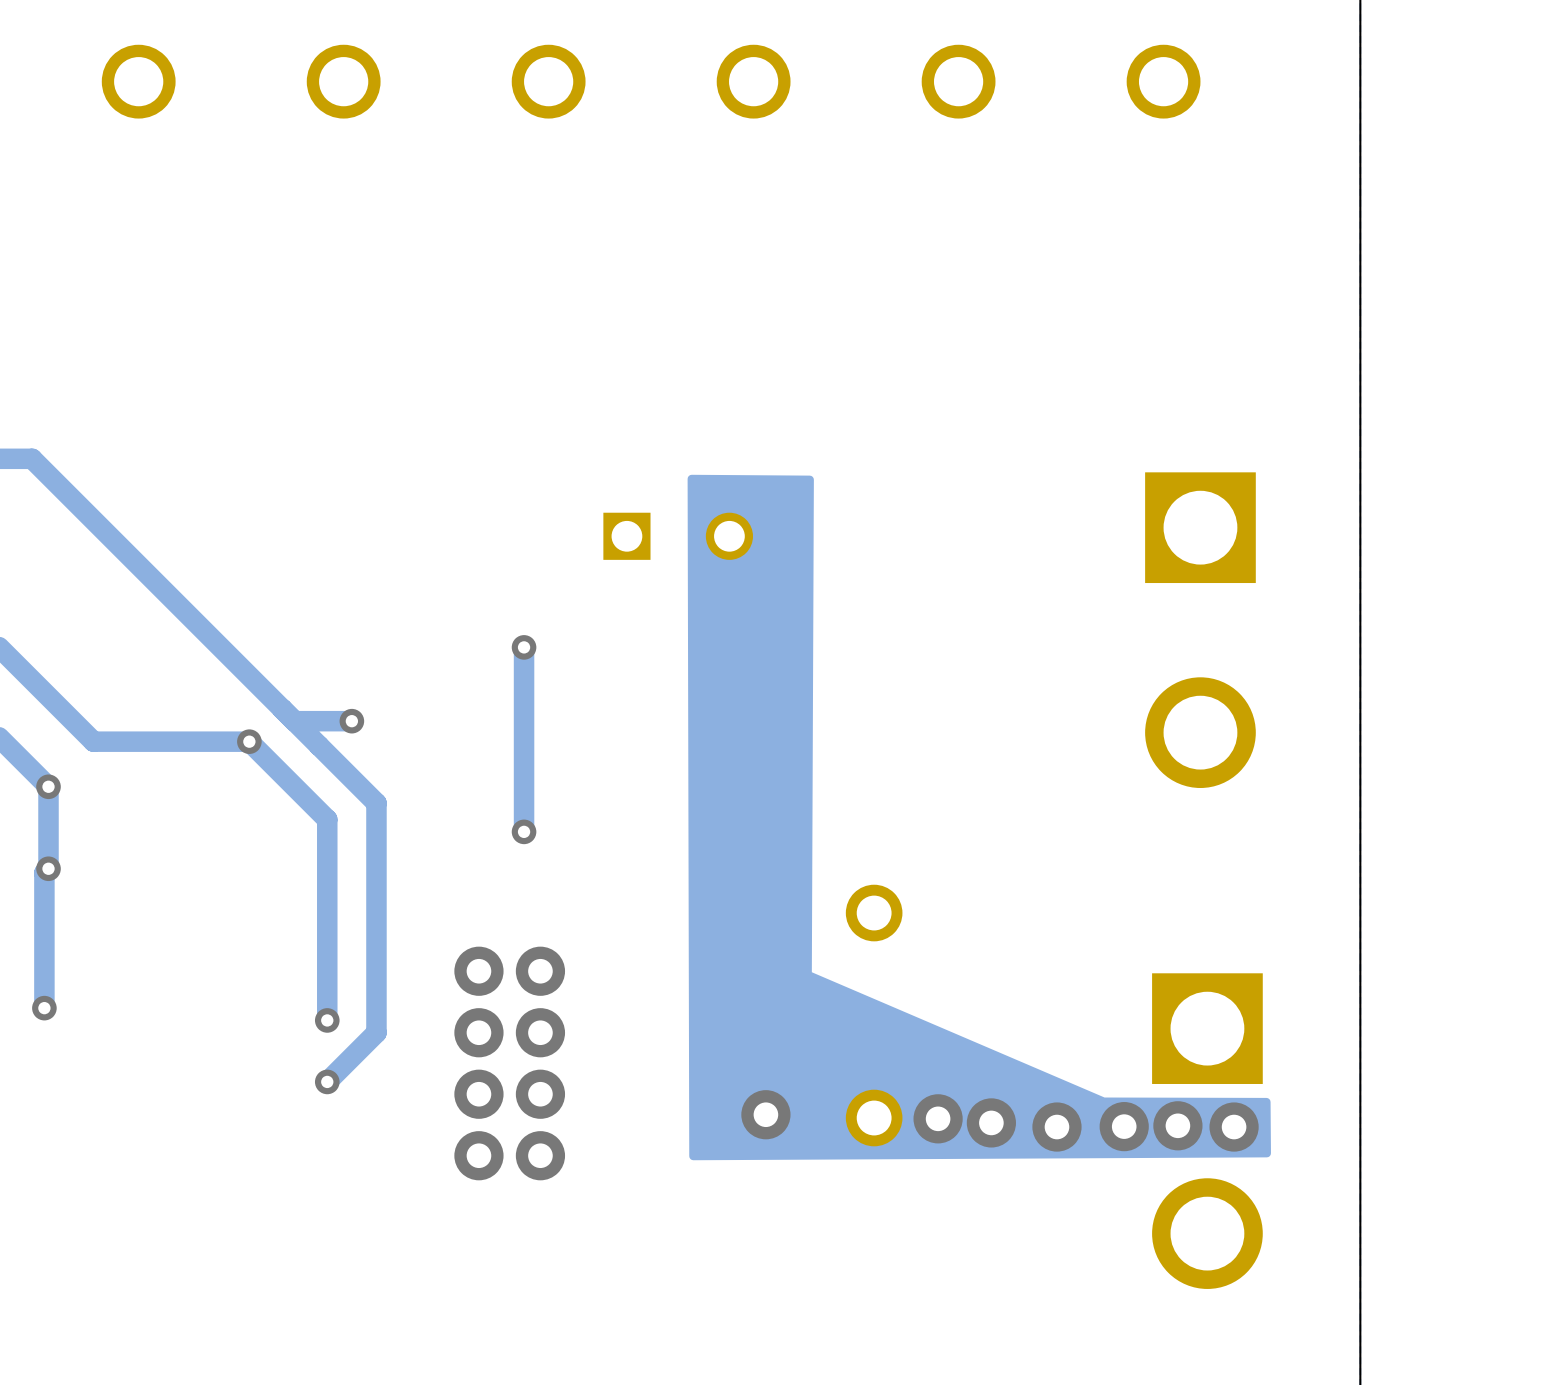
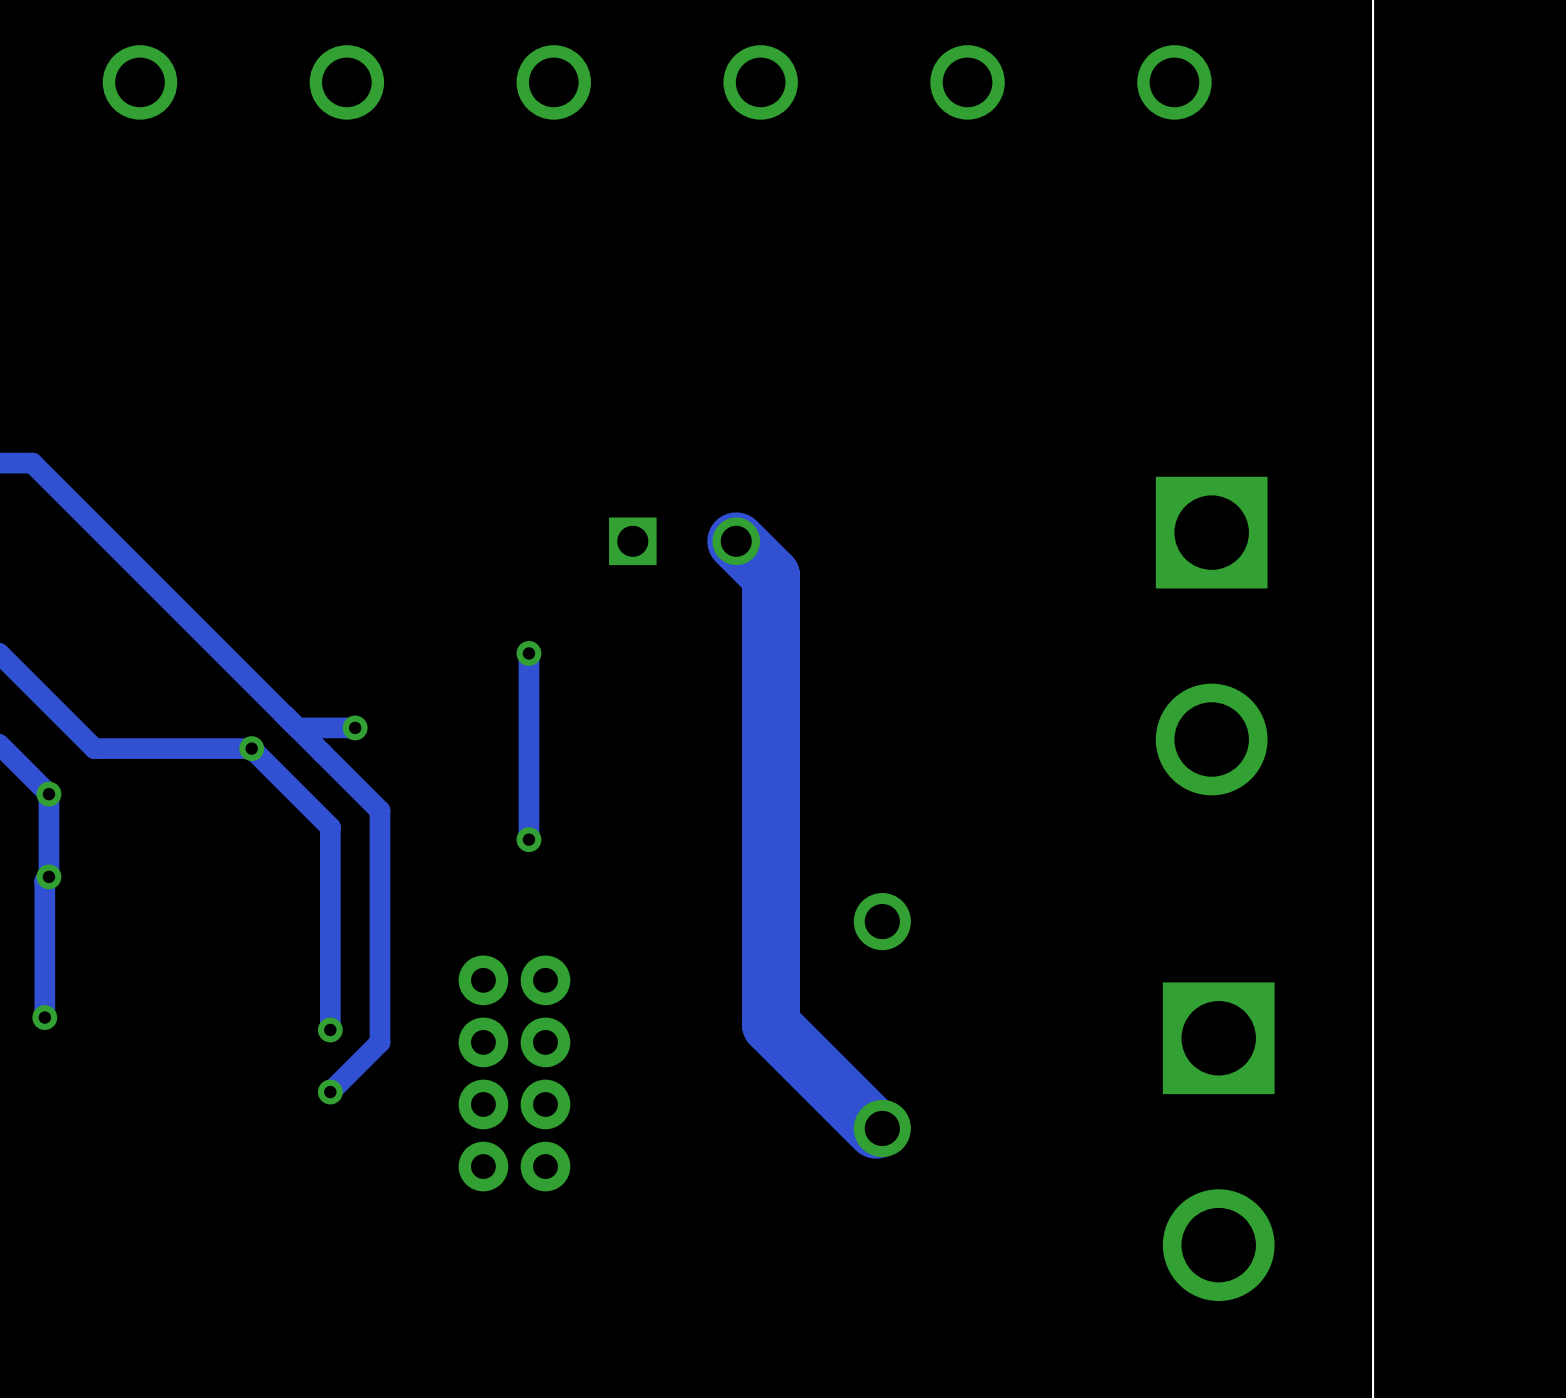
drawing: [687, 474, 1271, 1161] -> none
via: (765, 1114) -> none
via: (938, 1118) -> none
via: (991, 1122) -> none
via: (1177, 1125) -> none
via: (1124, 1126) -> none
via: (1056, 1127) -> none
via: (1234, 1127) -> none

